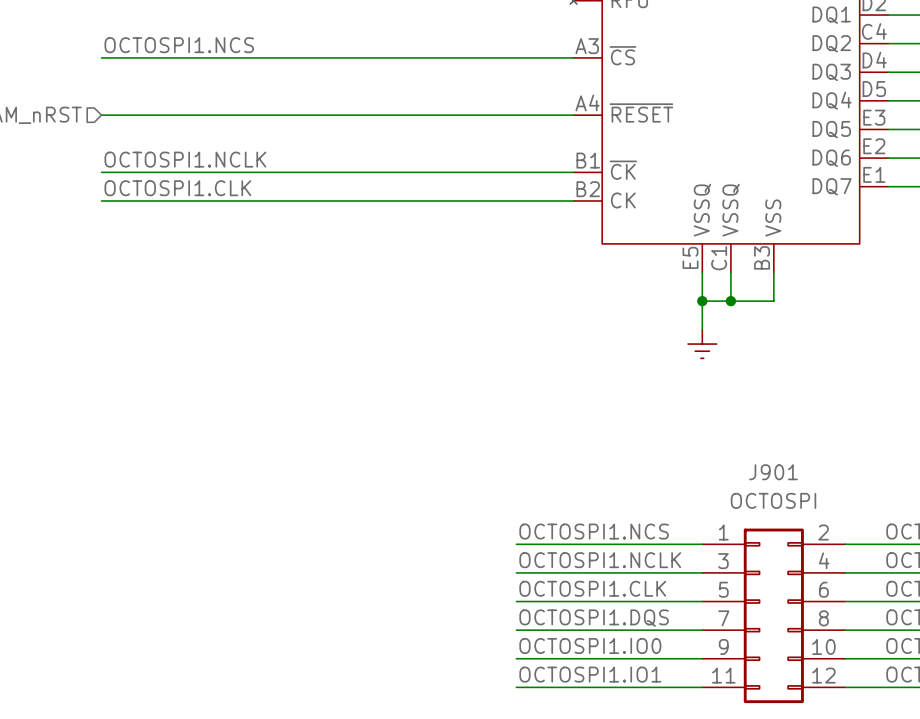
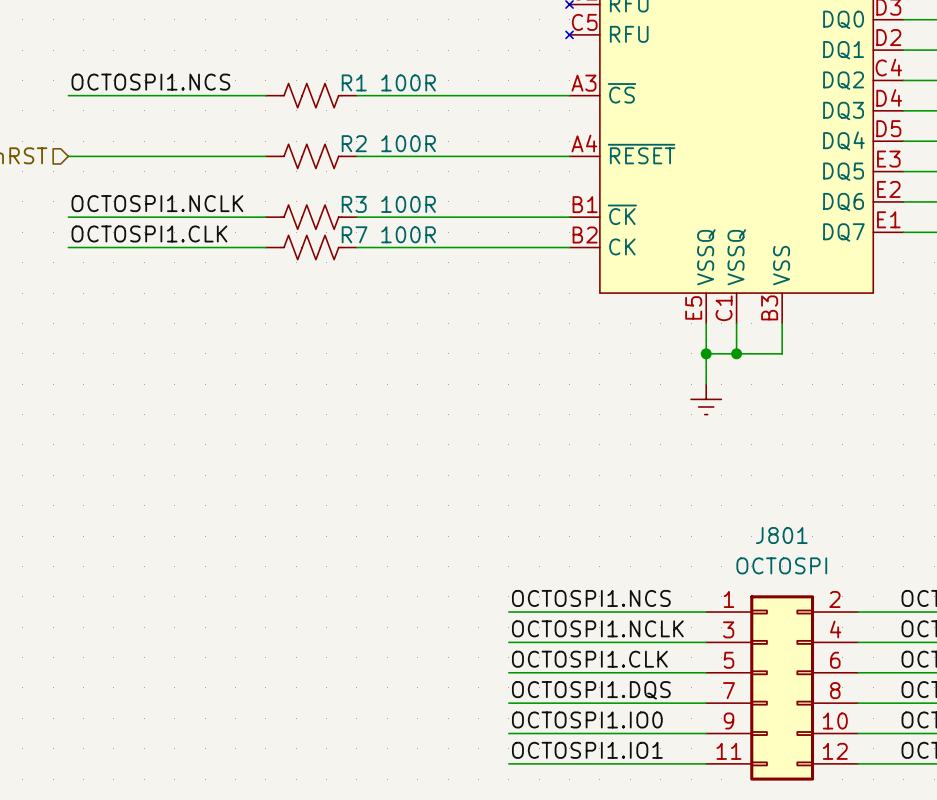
R1: none -> 100R (311, 95)
R2: none -> 100R (311, 156)
R3: none -> 100R (311, 217)
R7: none -> 100R (311, 247)
J901 name: J901 (773, 472) -> J801 (781, 535)

